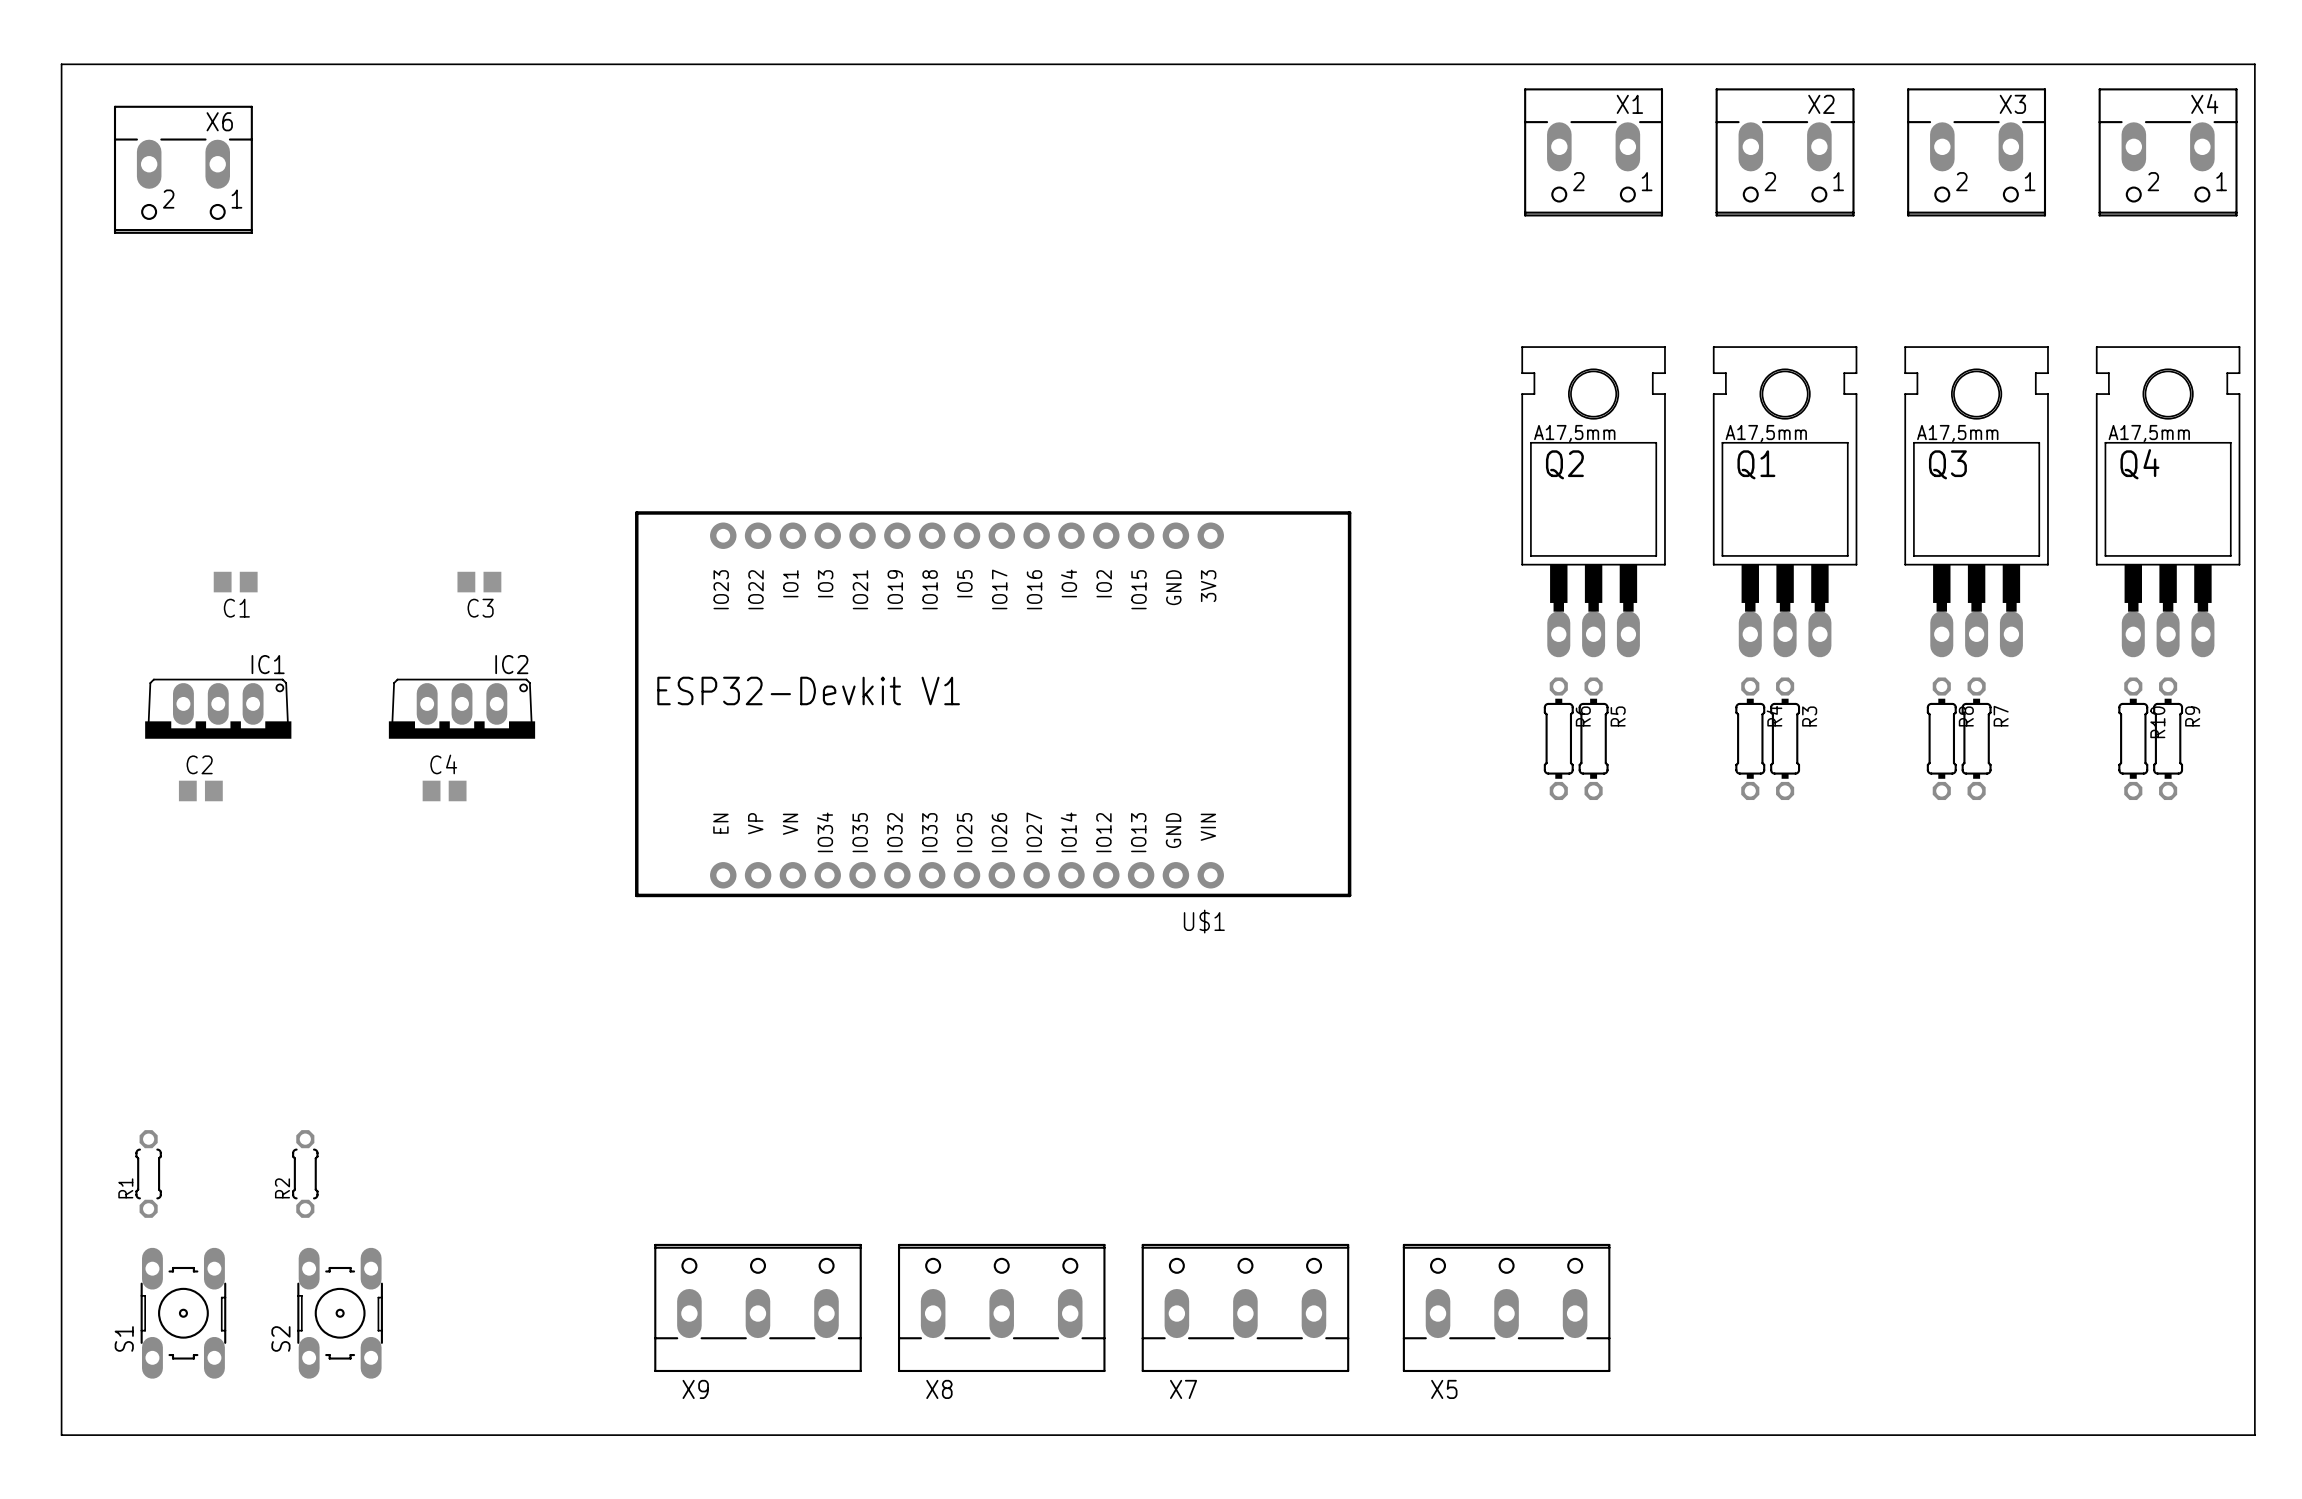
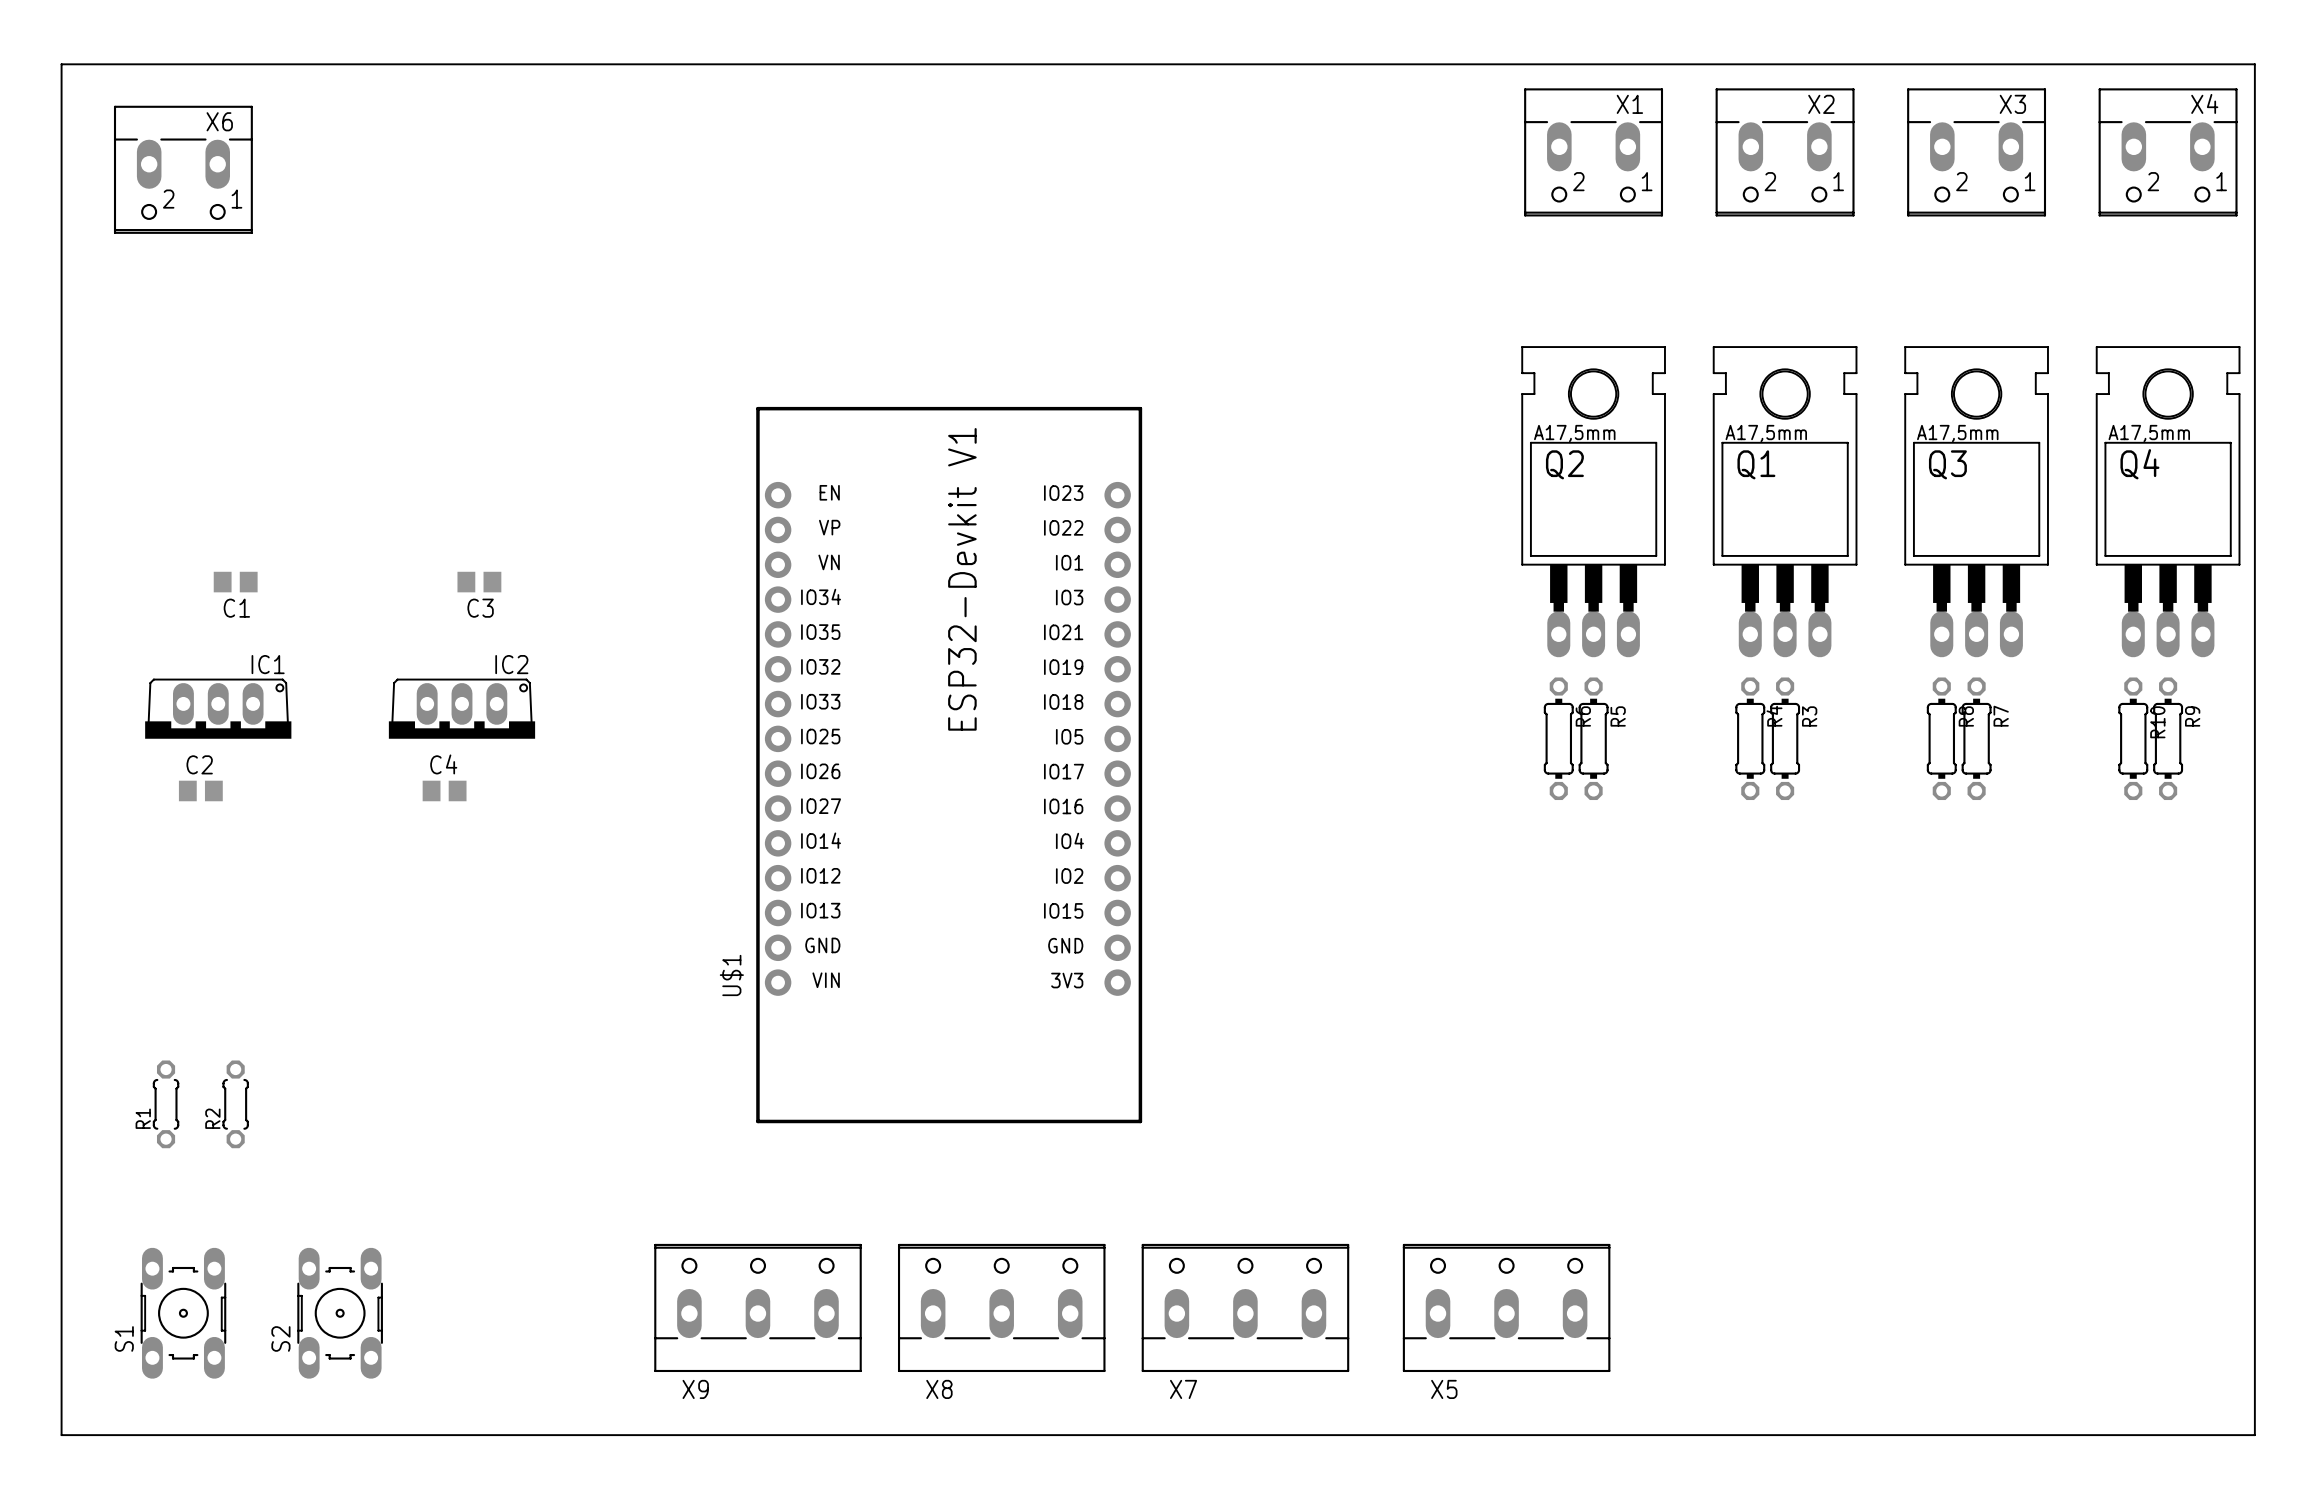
U$1 footprint: [635, 511, 1352, 898] -> [756, 406, 1143, 1124]
U$1 name position: U$1 (1204, 921) -> U$1 (731, 975)
R1 position: (148, 1173) -> (166, 1104)
R2 position: (305, 1173) -> (235, 1104)

